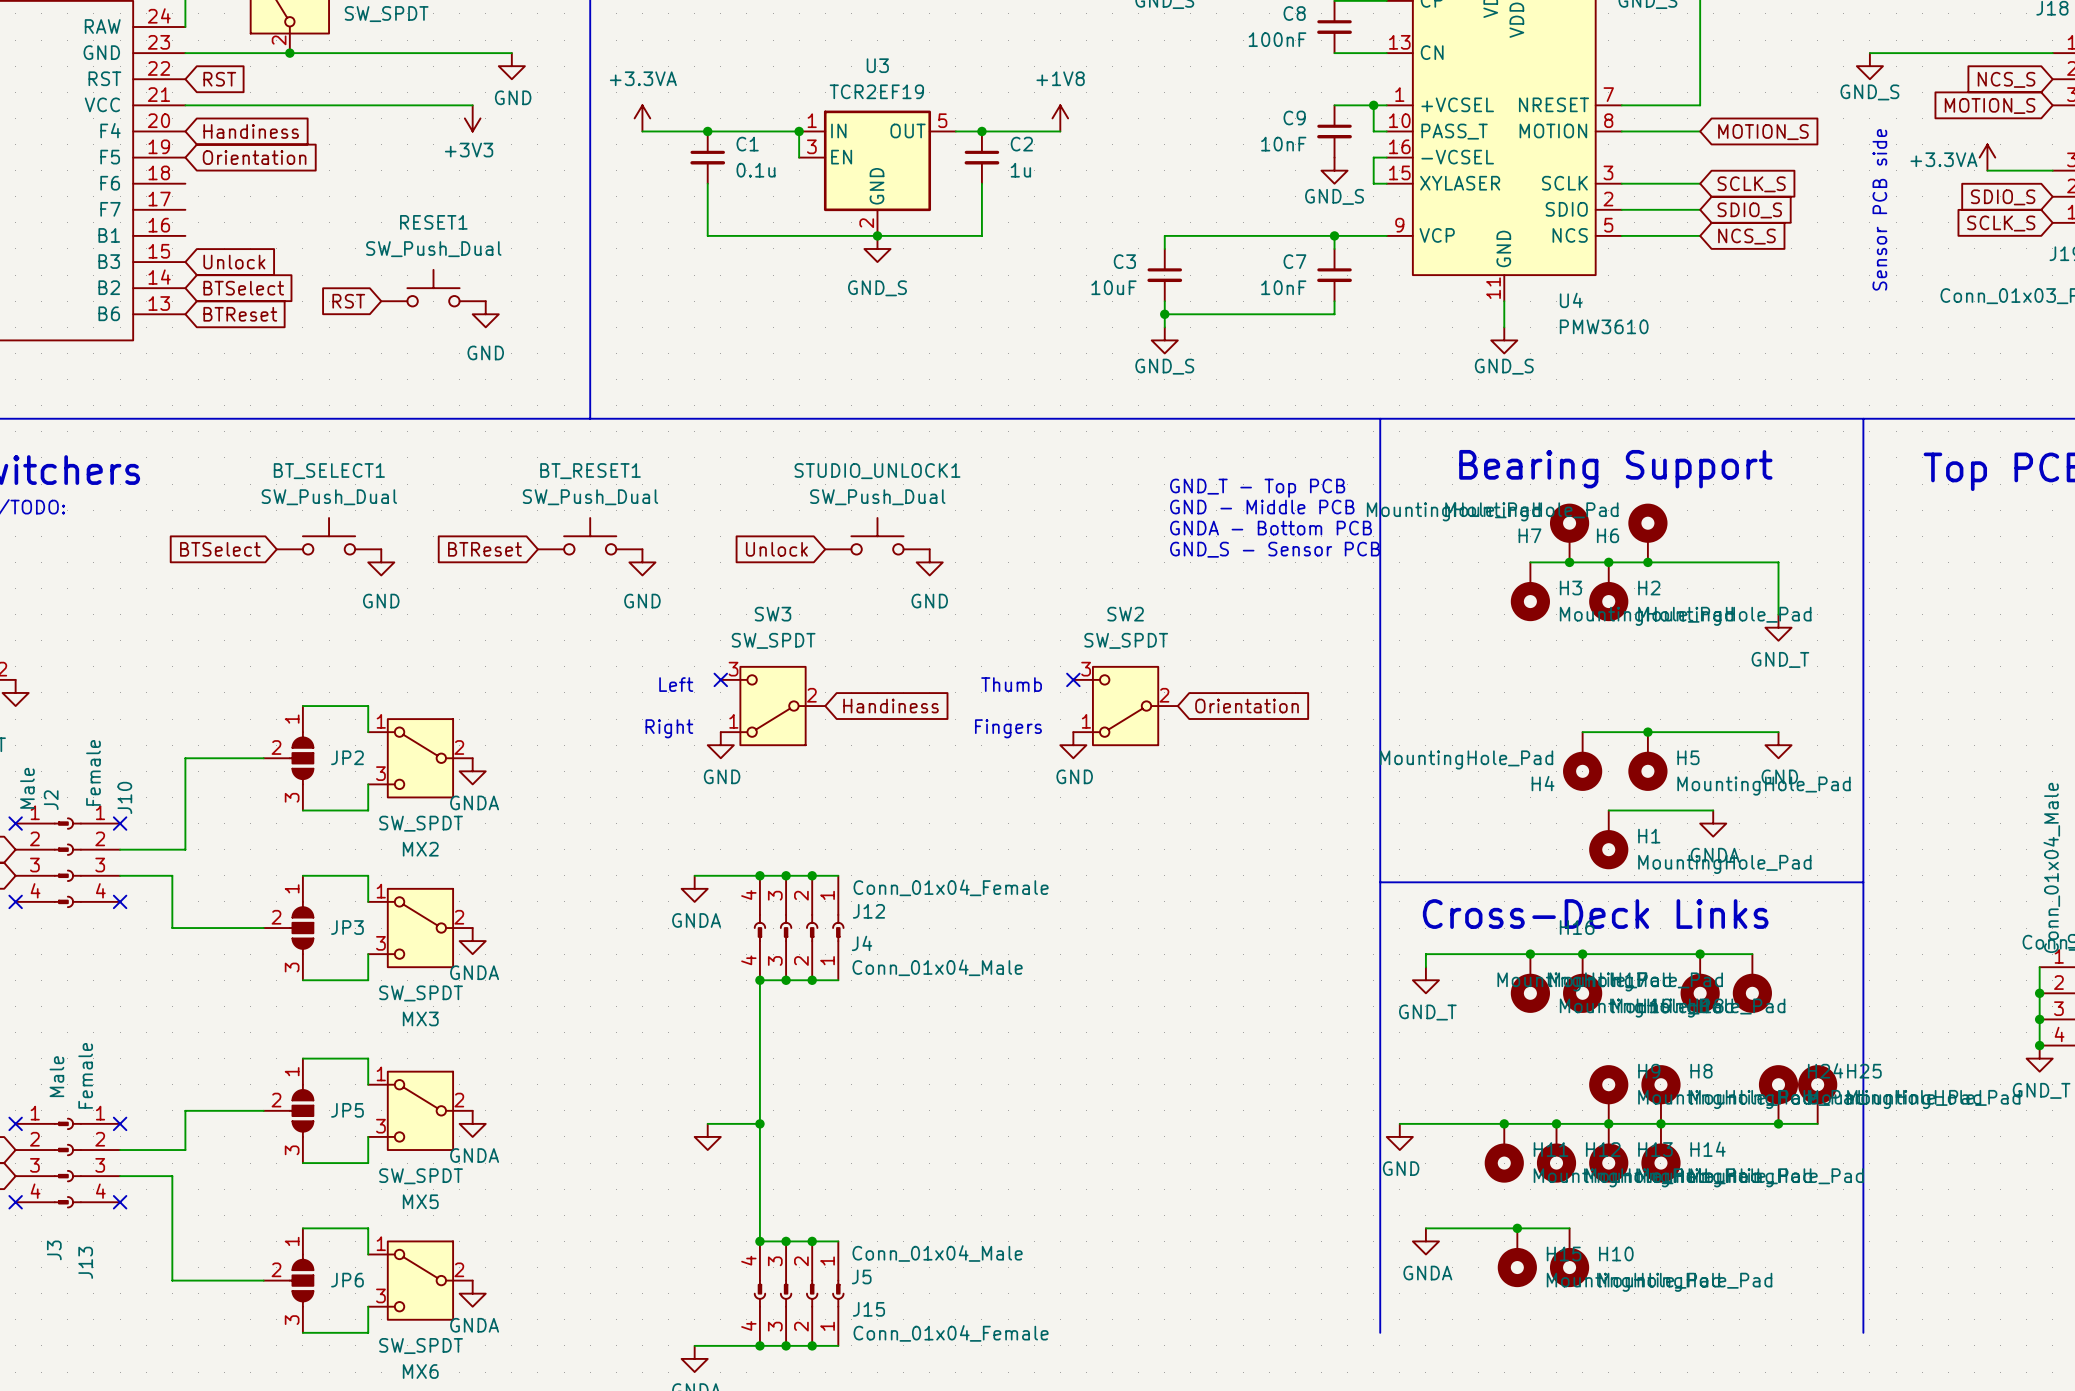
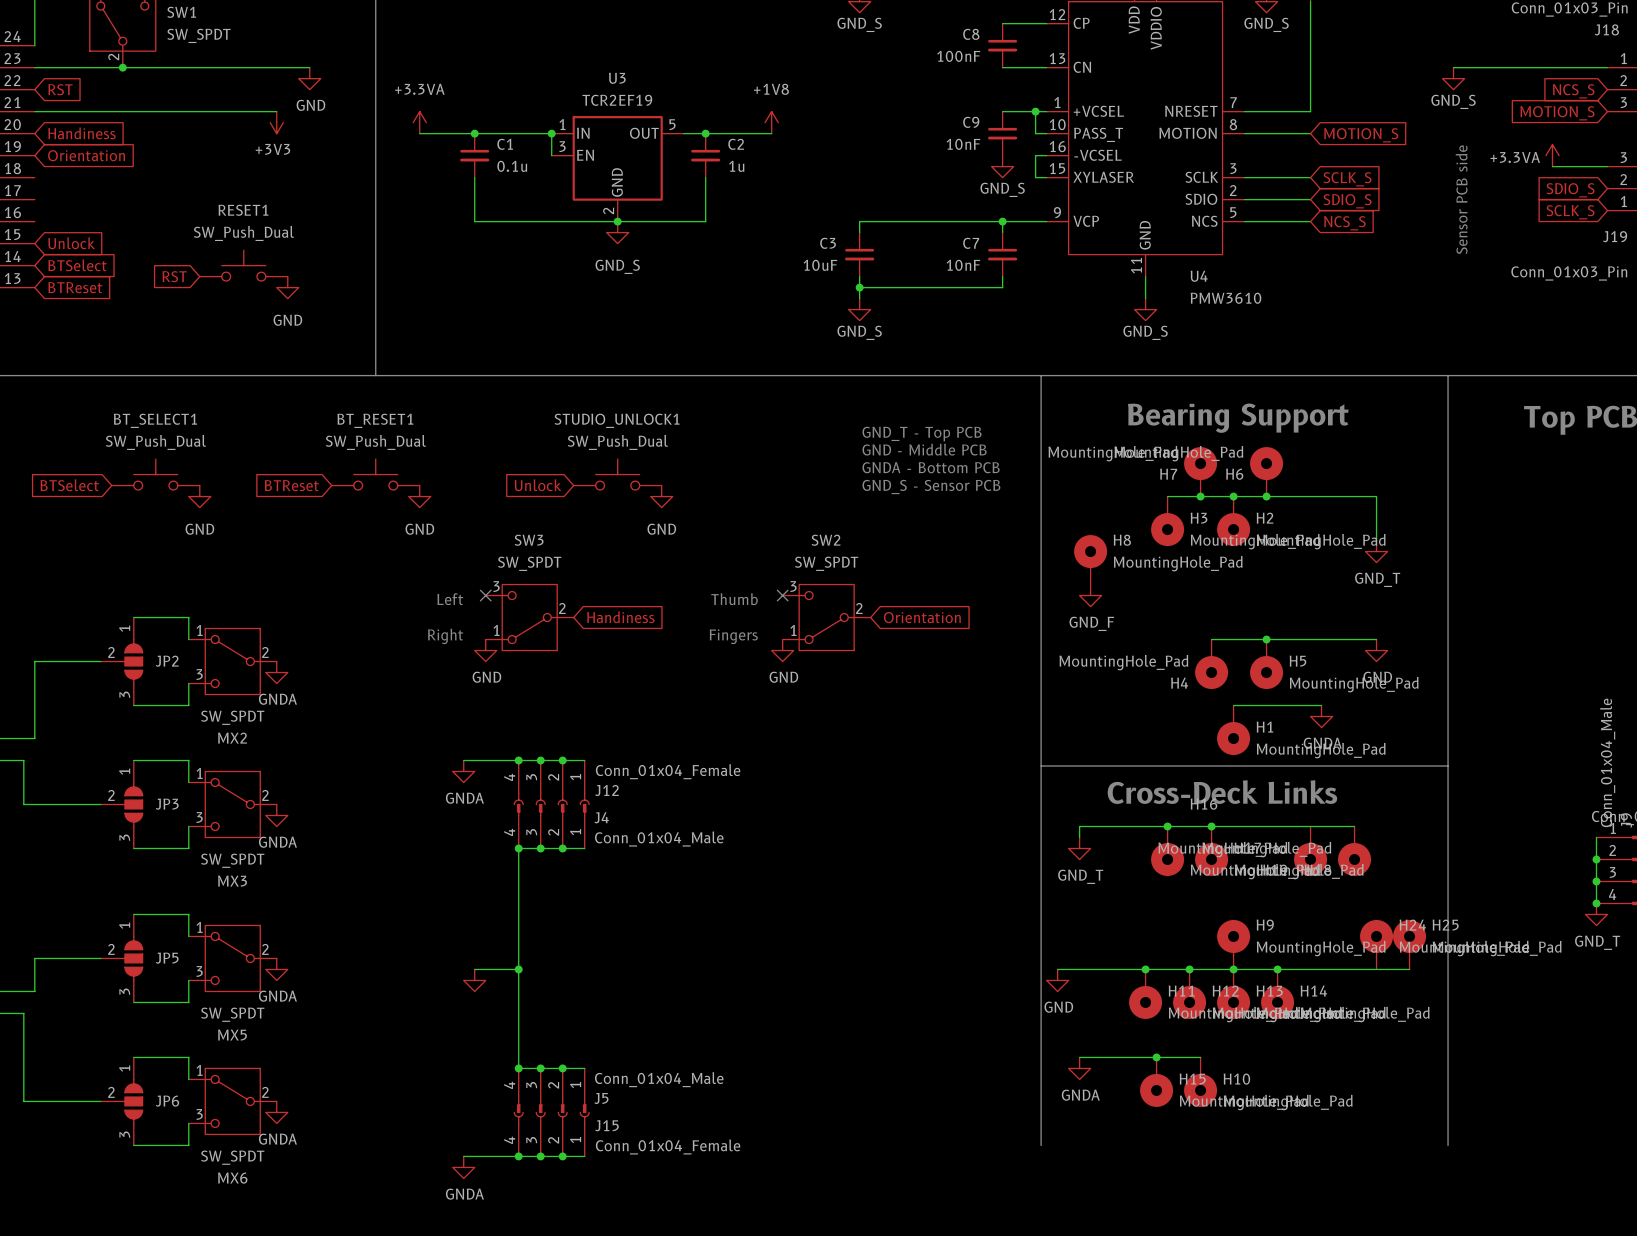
power symbol: none -> GND_F (1090, 595)
junction: (1700, 954) -> none
H8 position: (1660, 1094) -> (1090, 559)
junction: (1778, 1123) -> none

